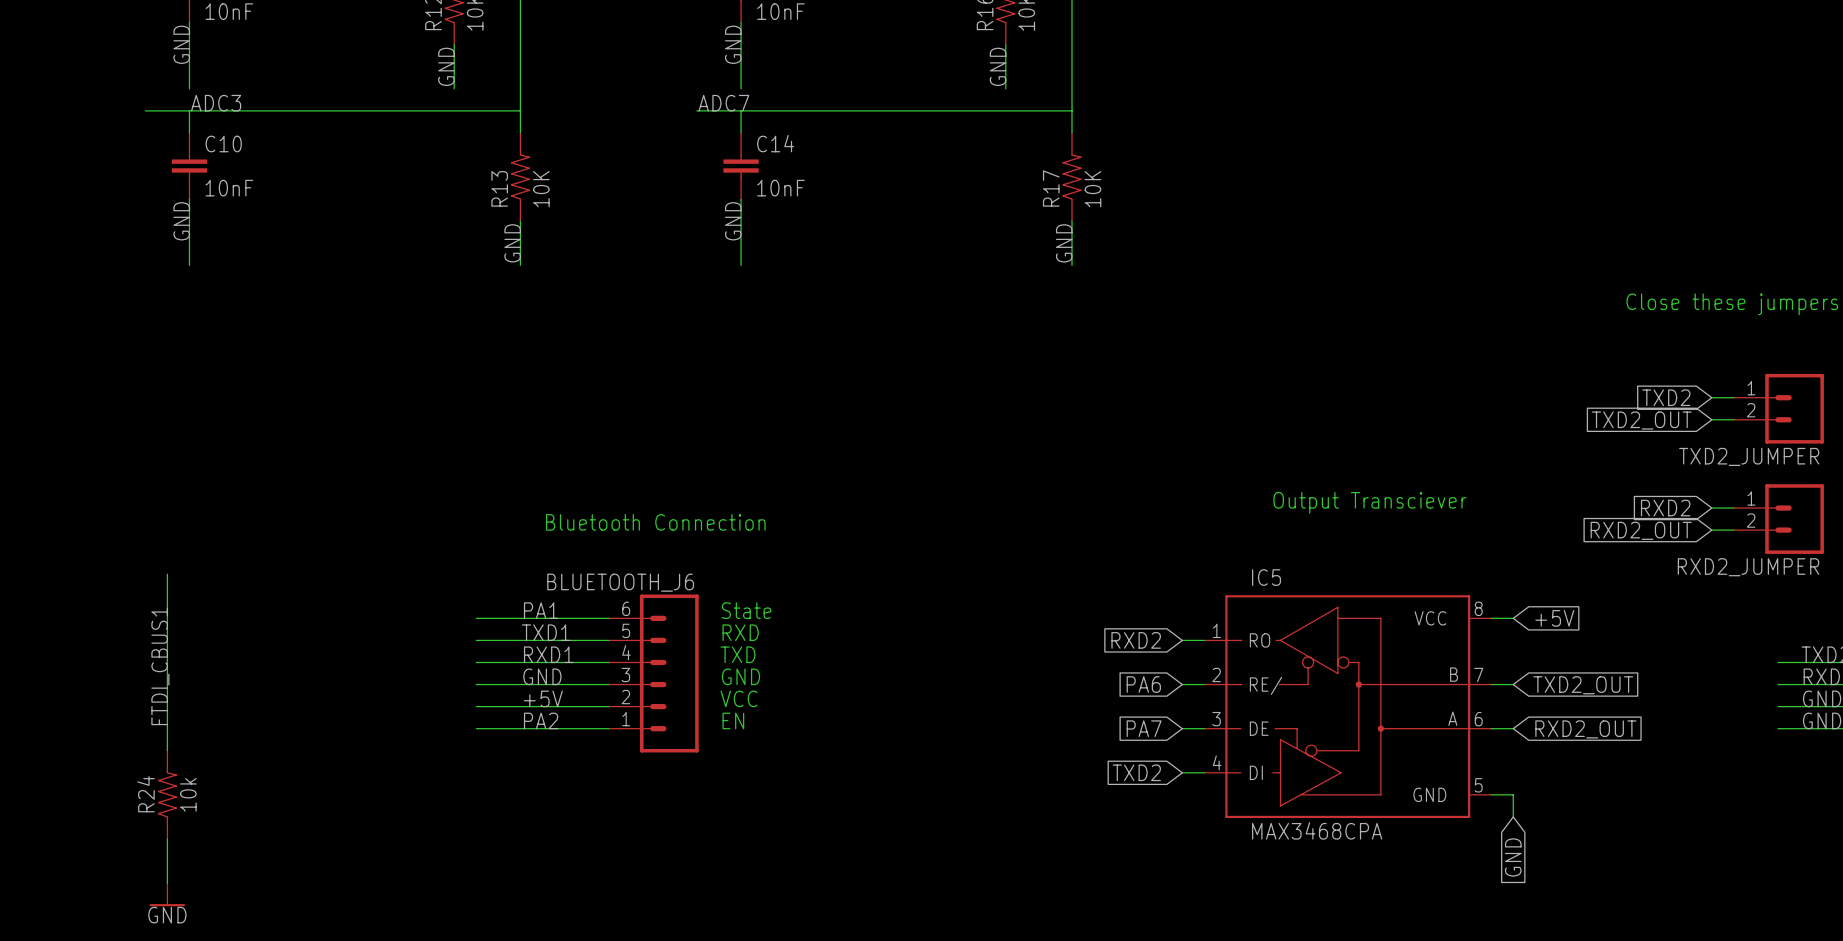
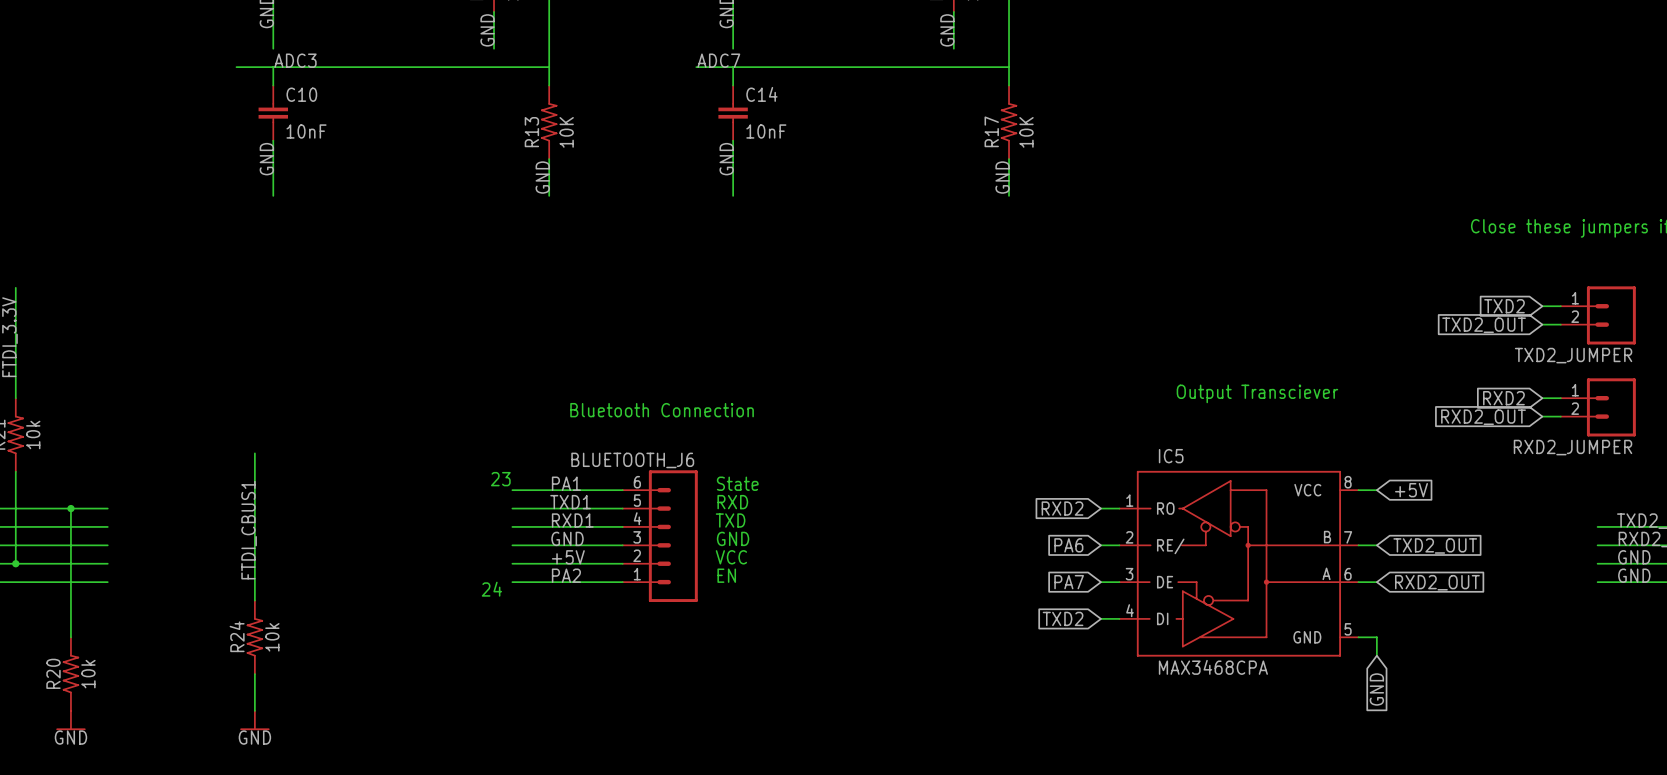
text: none -> 23 (500, 479)
text: none -> 24 (491, 589)

